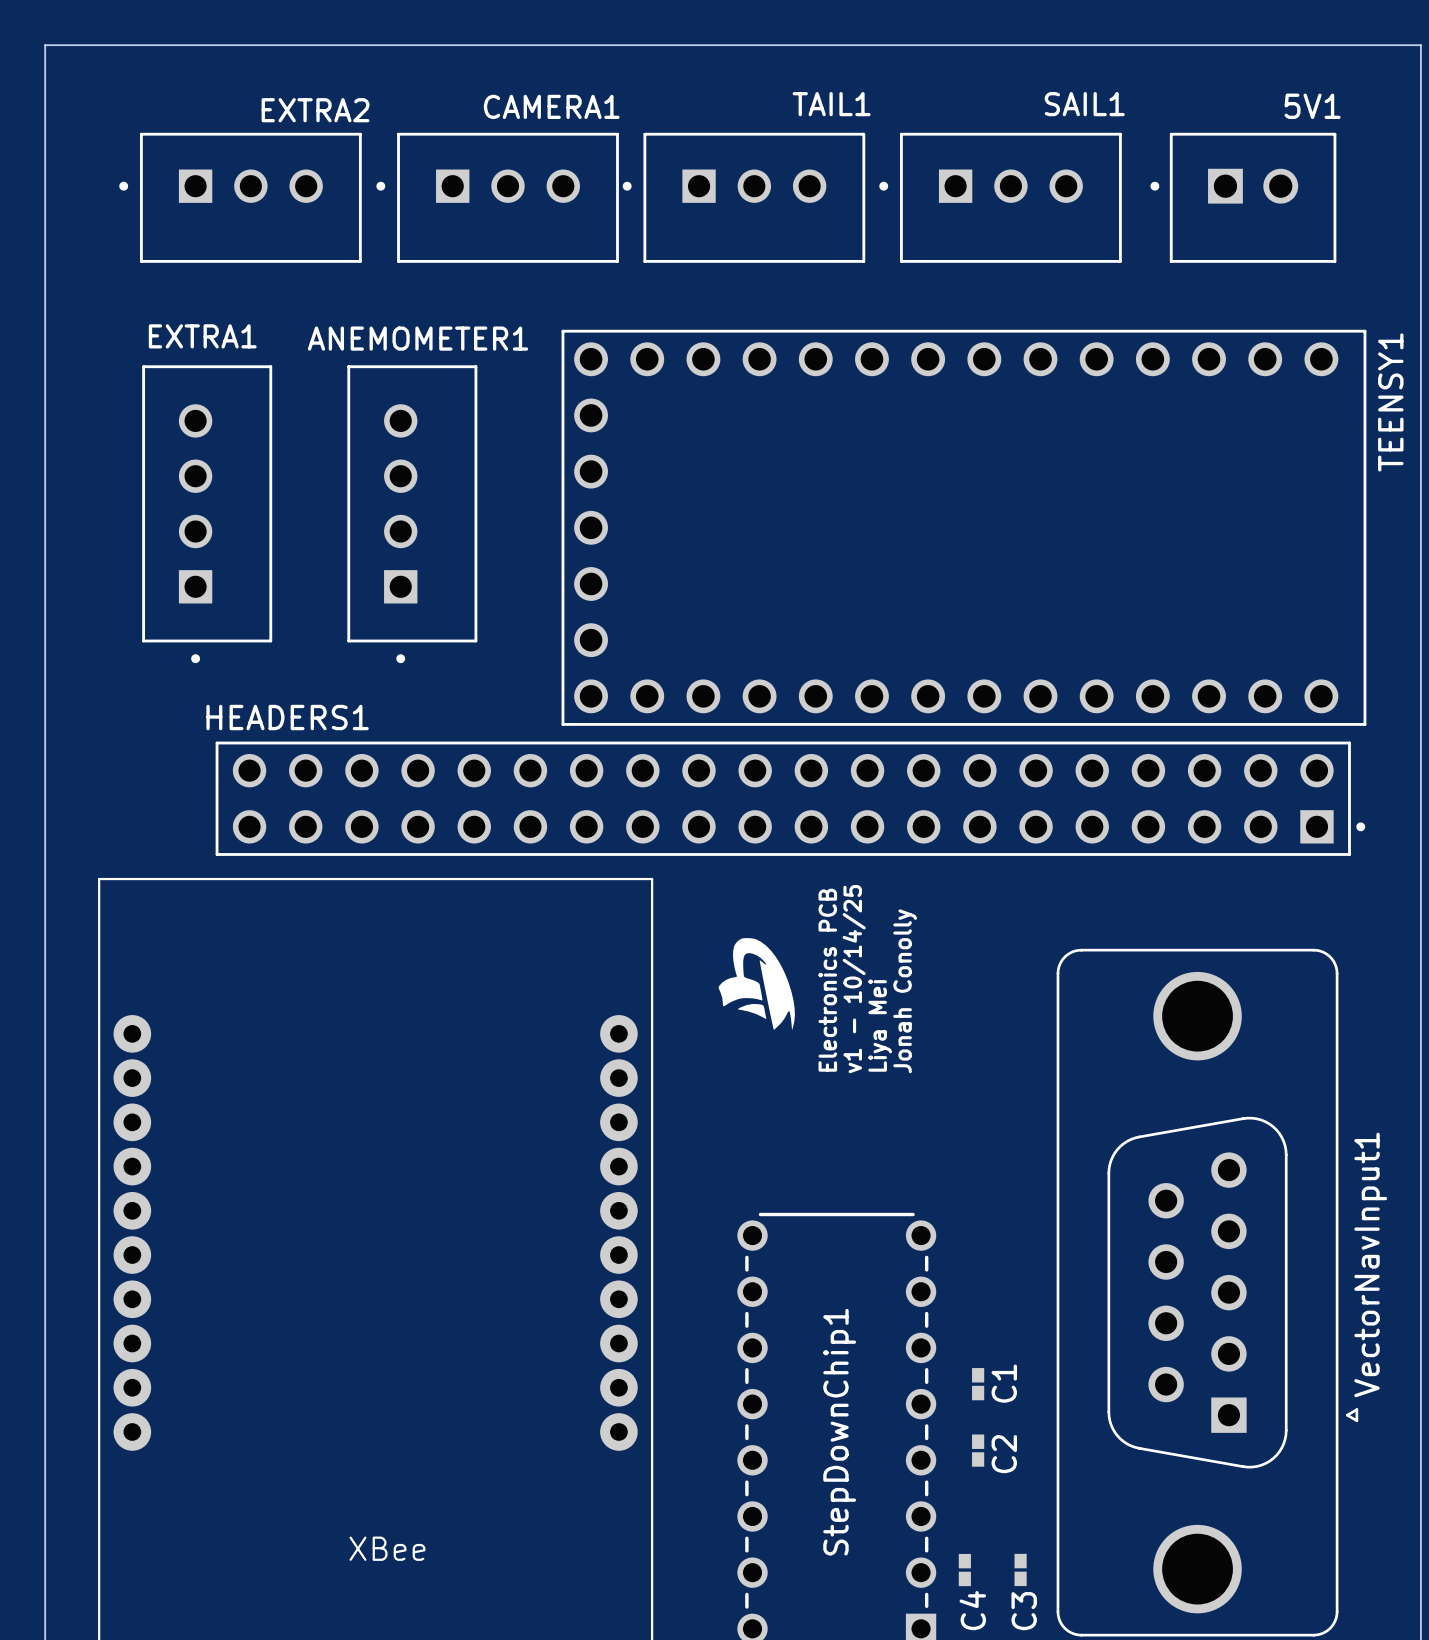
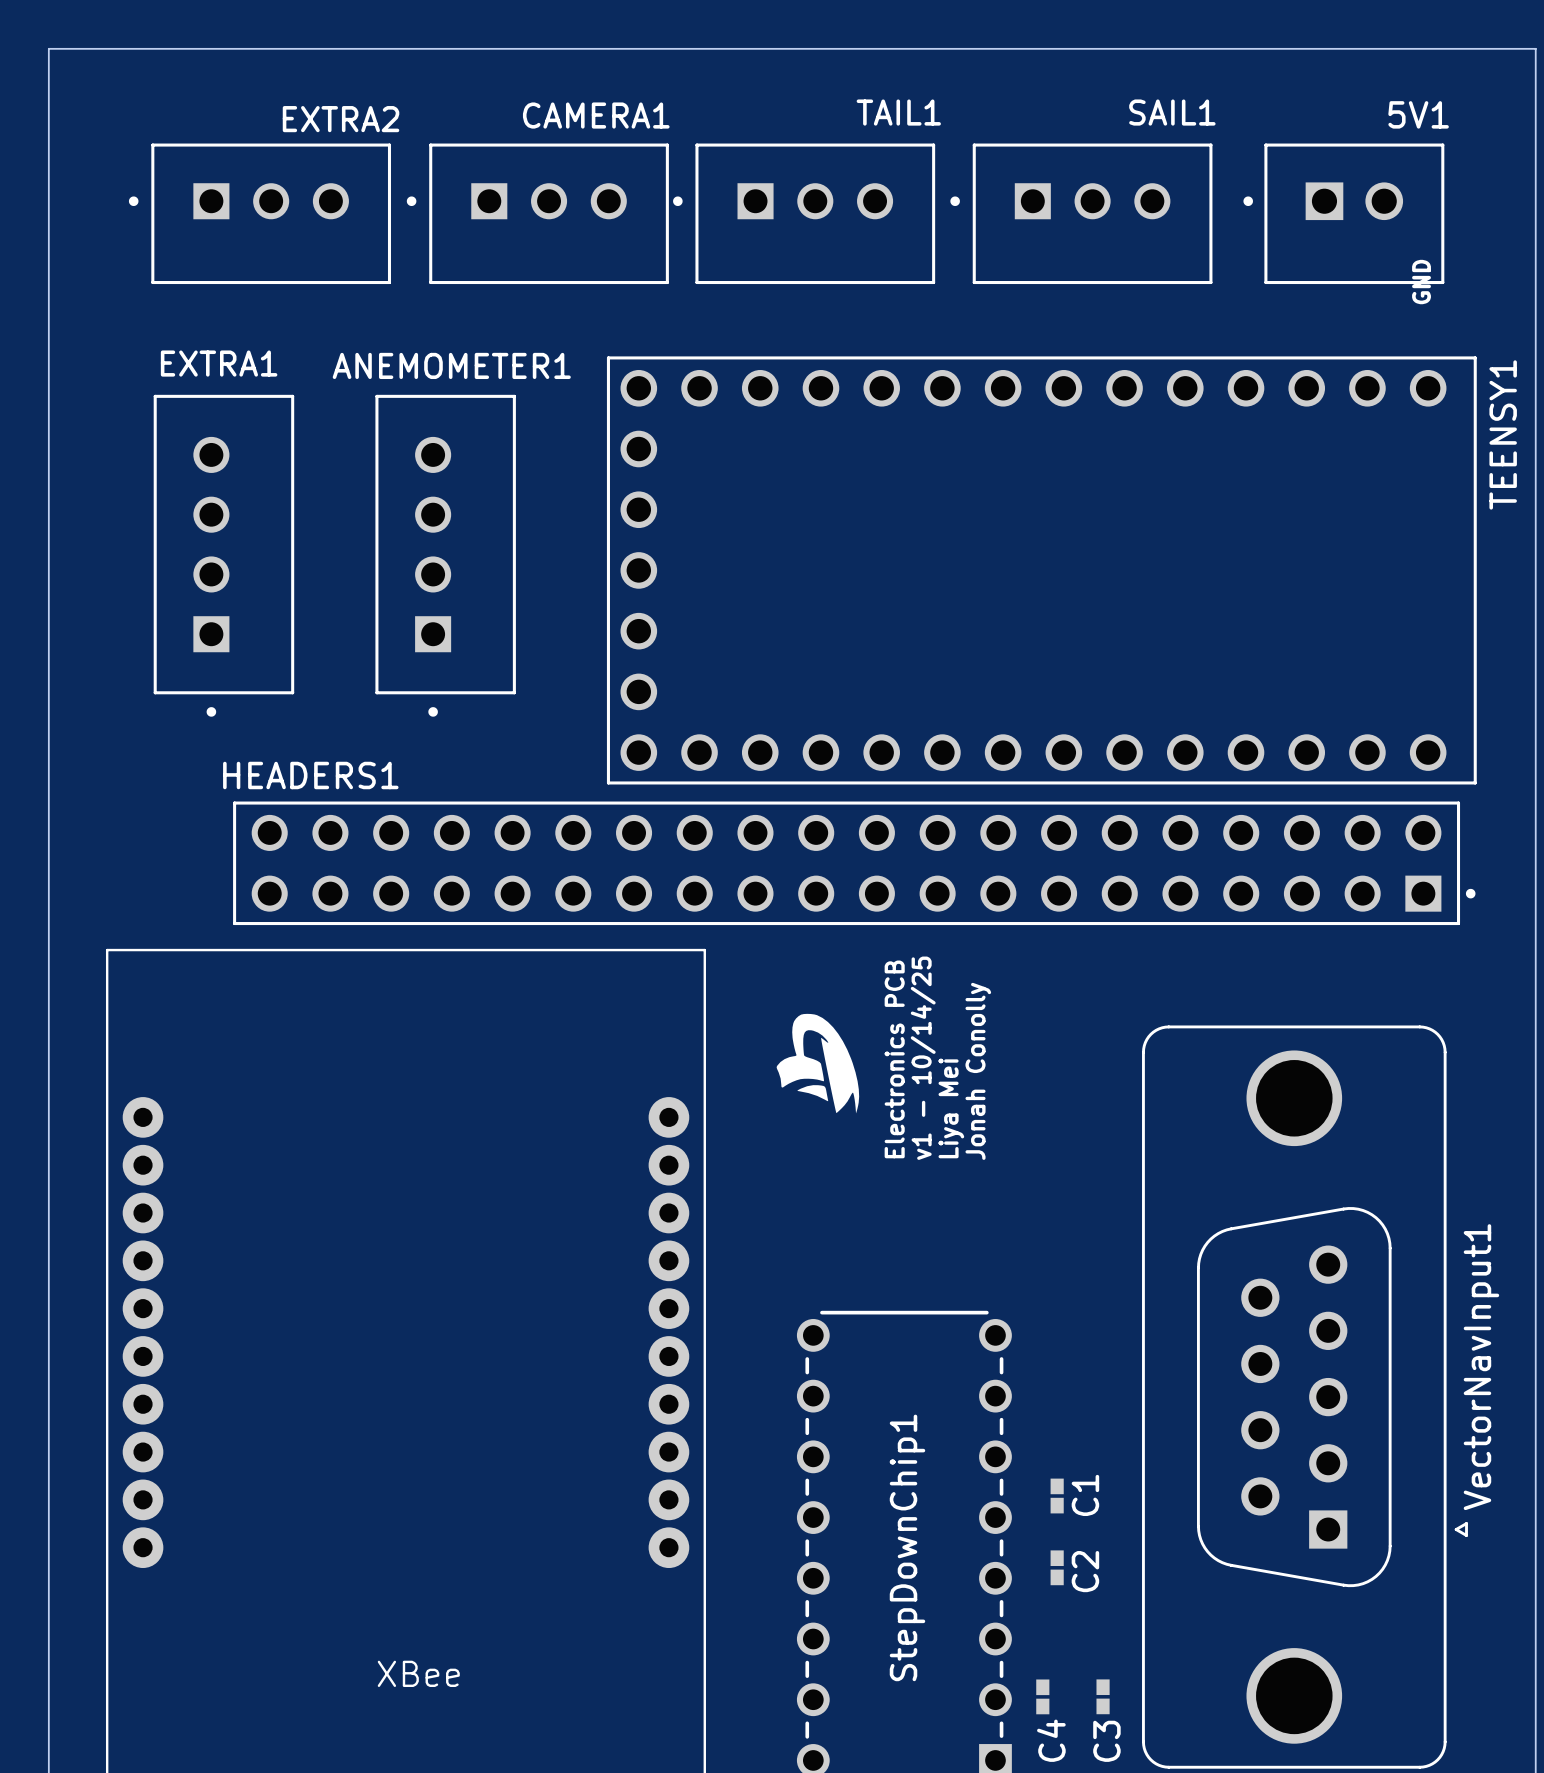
TEENSY1 text: none -> GND (1421, 282)

